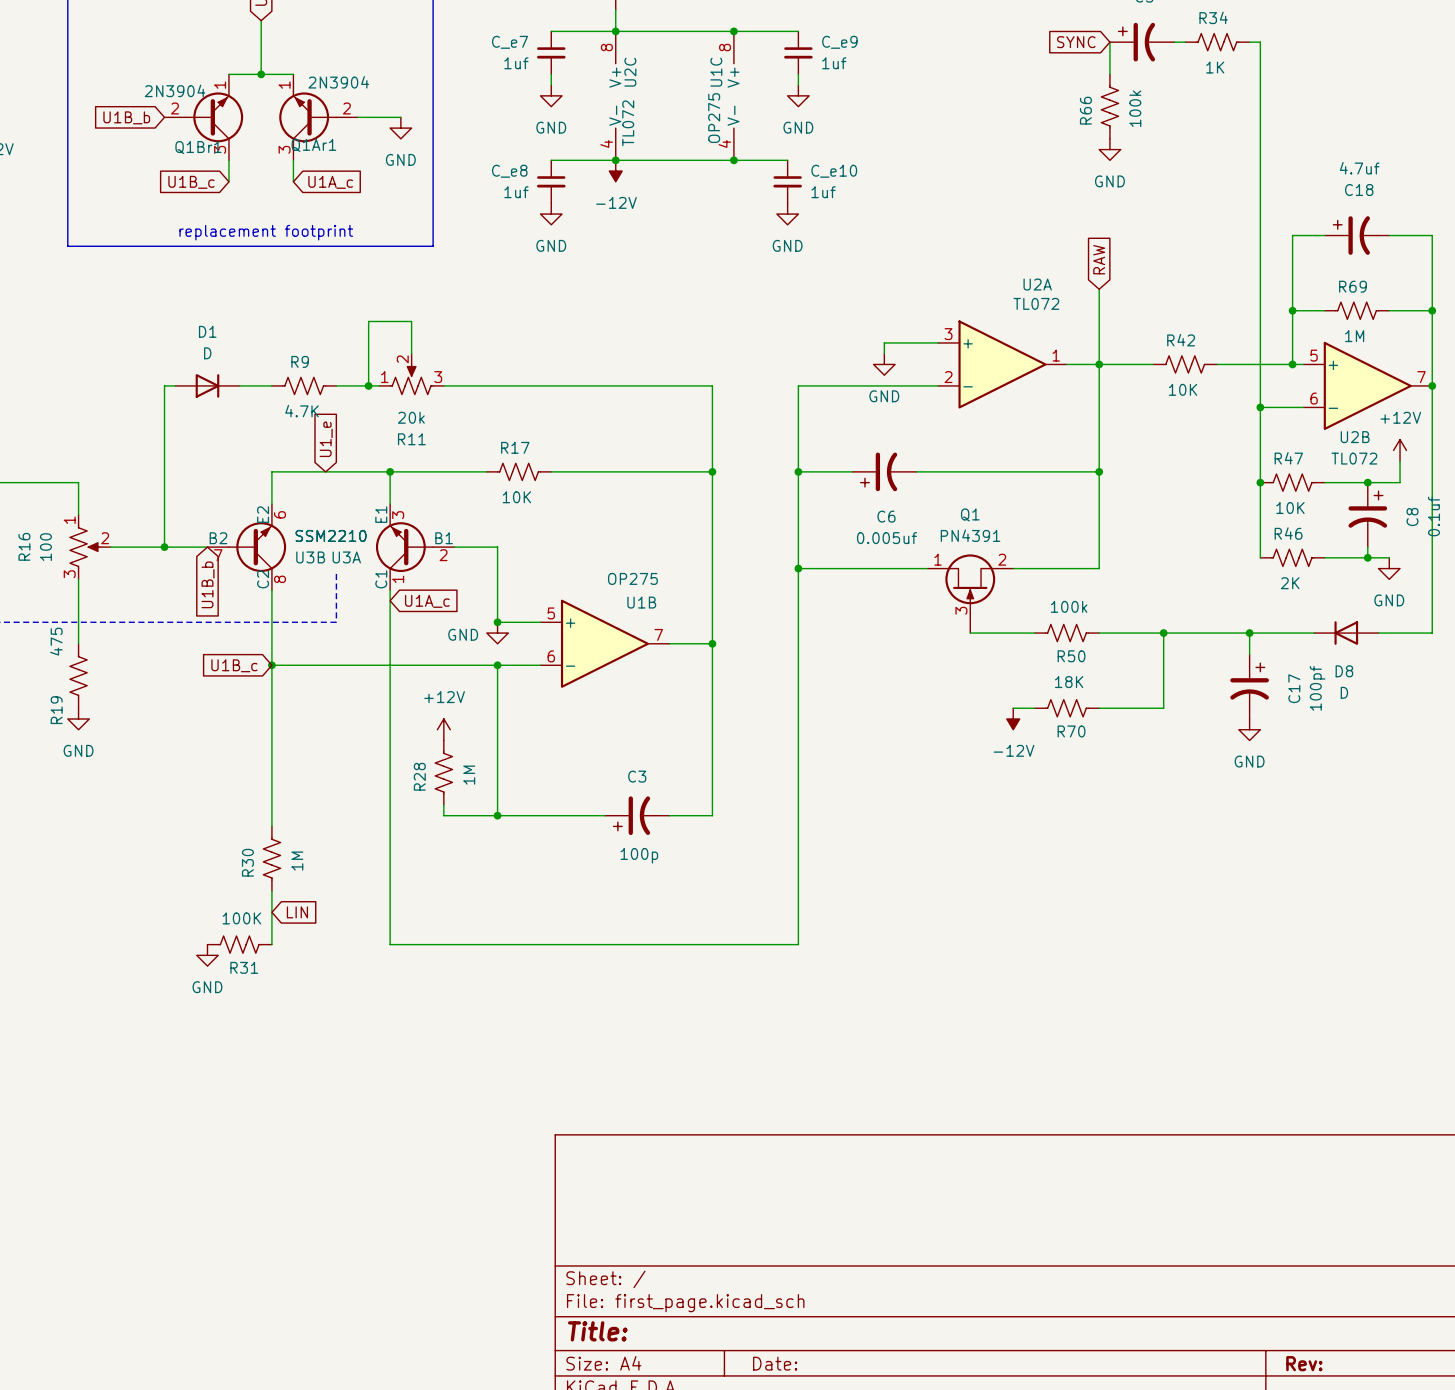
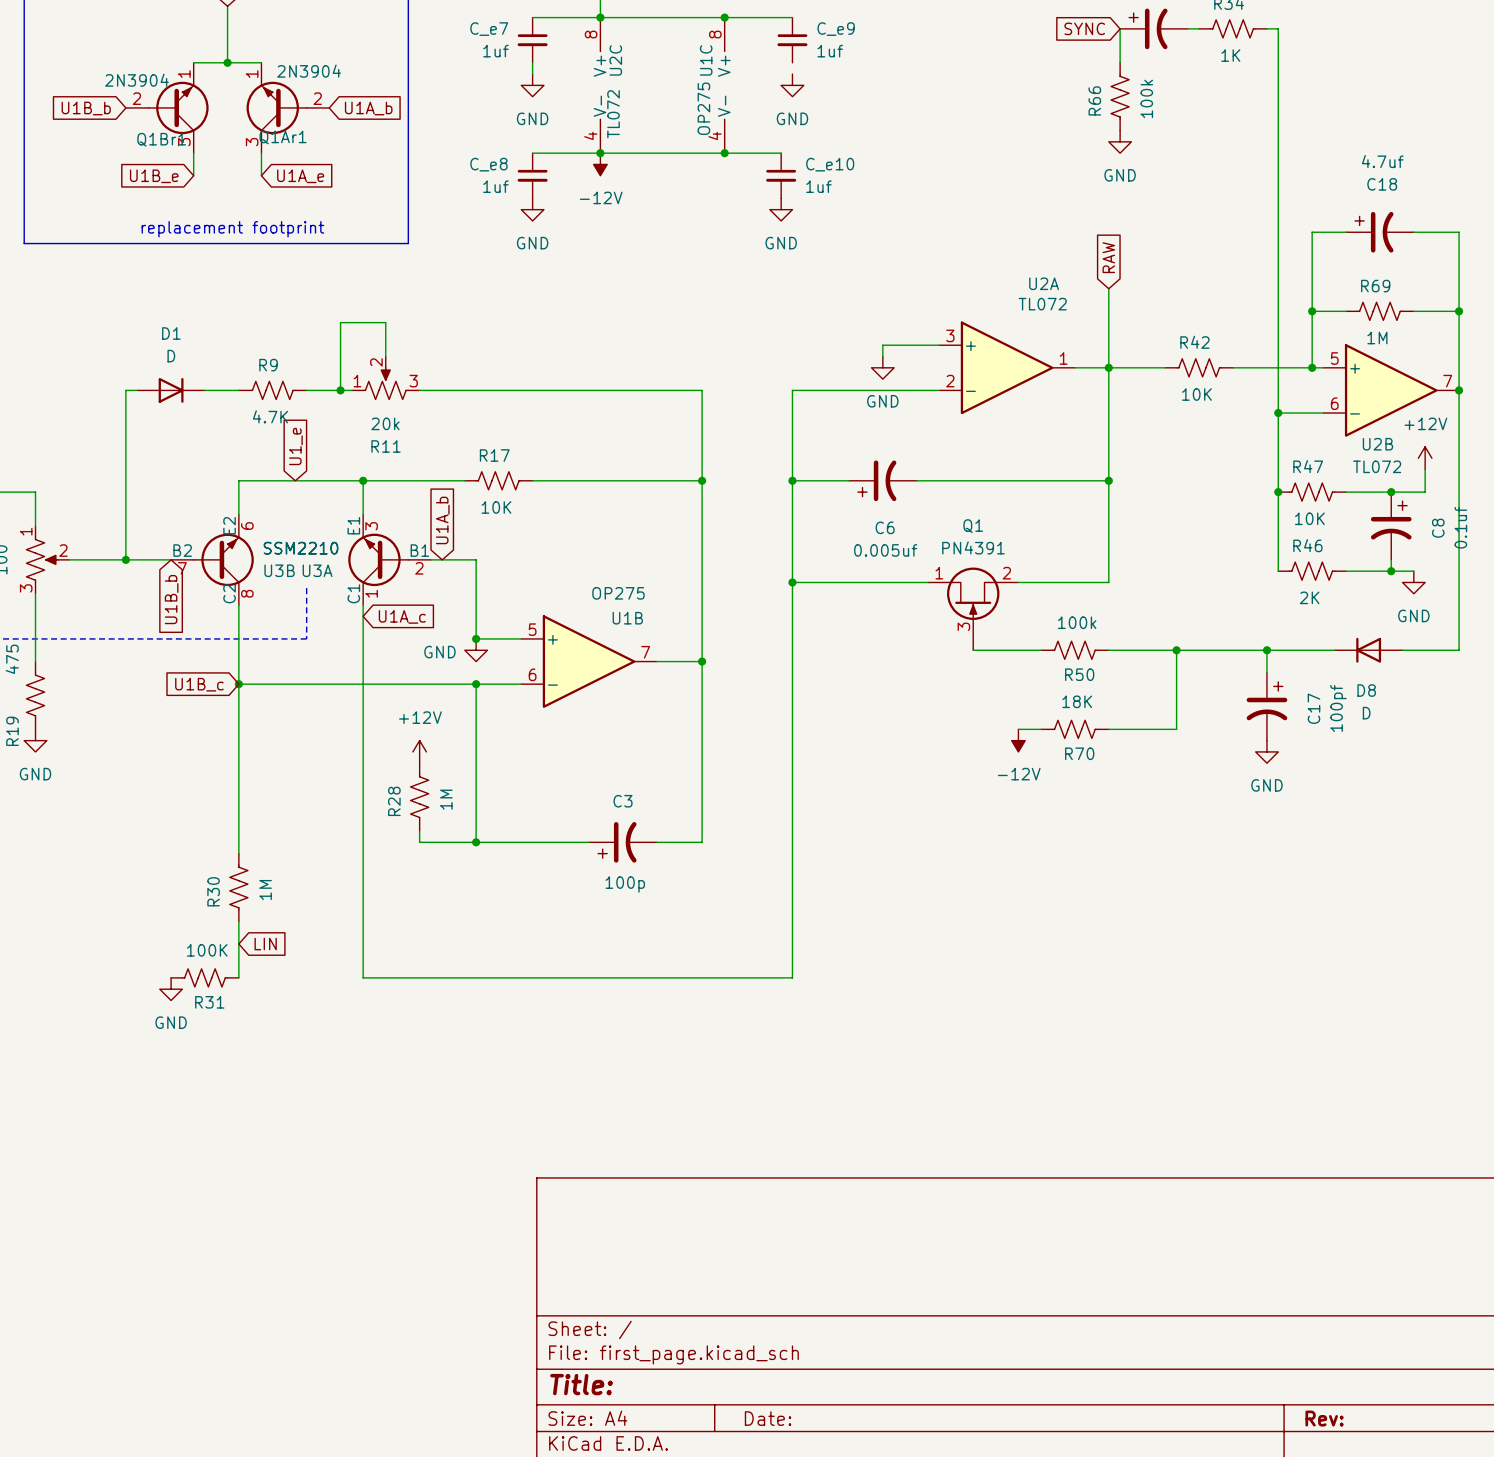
wire: (798, 74) (798, 85) -> none
wire: (357, 117) (400, 117) -> none
global label: none -> U1A_b (368, 108)
power symbol: GND (400, 128) -> none
global label: U1B_c (191, 182) -> U1B_e (154, 176)
global label: U1A_c (330, 182) -> U1A_e (300, 176)
global label: none -> U1A_b (442, 520)

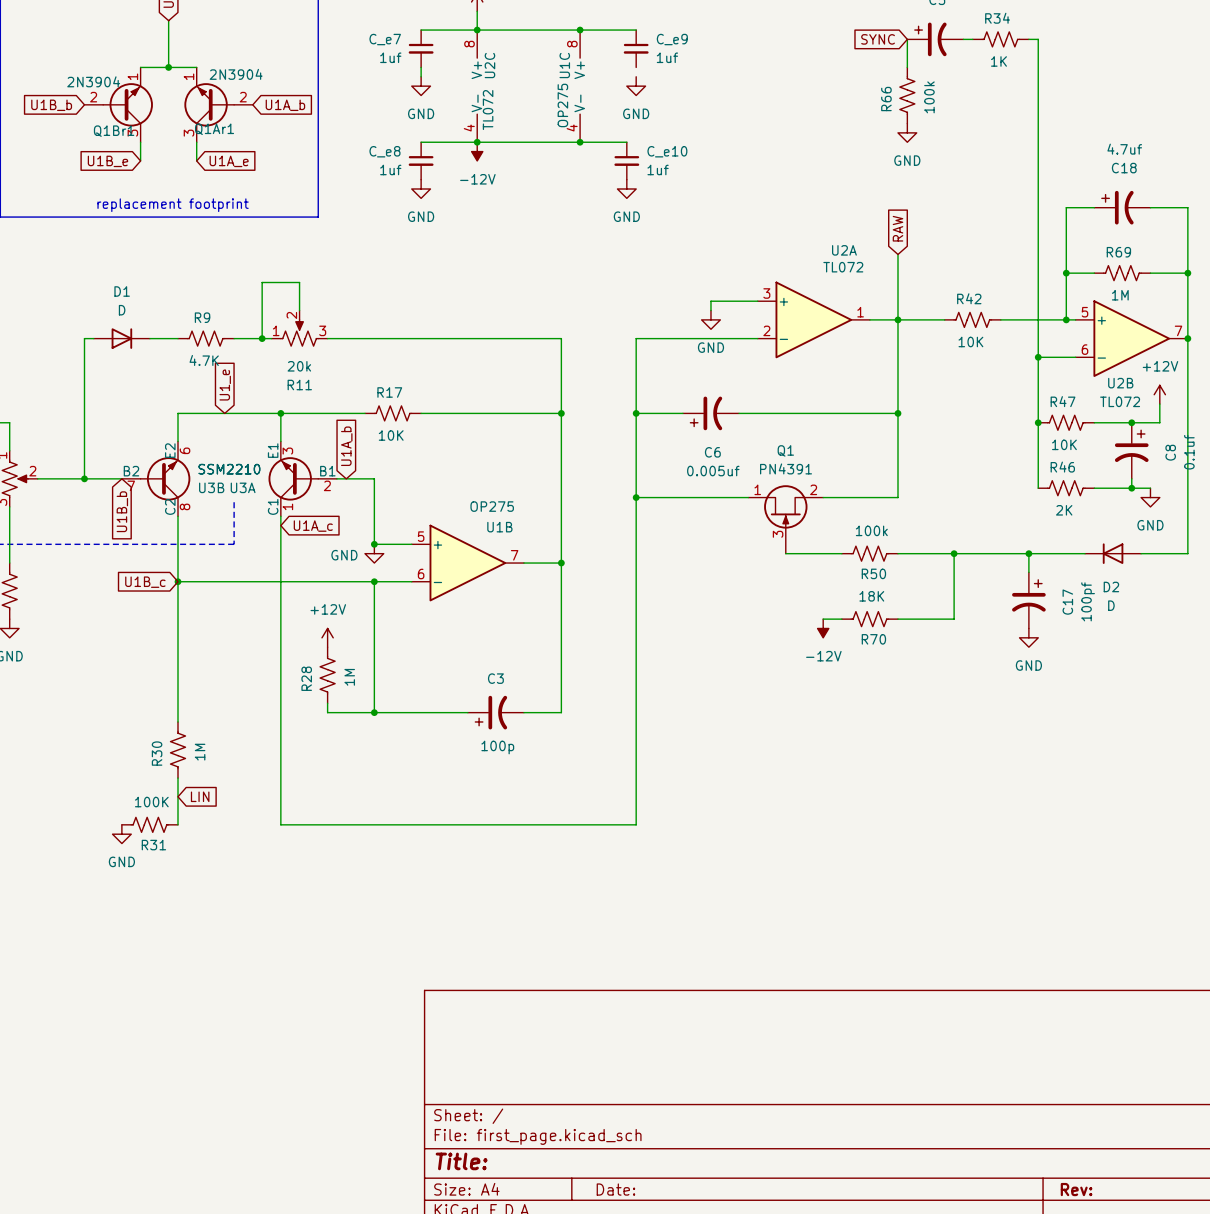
D8 name: D8 (1366, 690) -> D2 (1111, 586)

